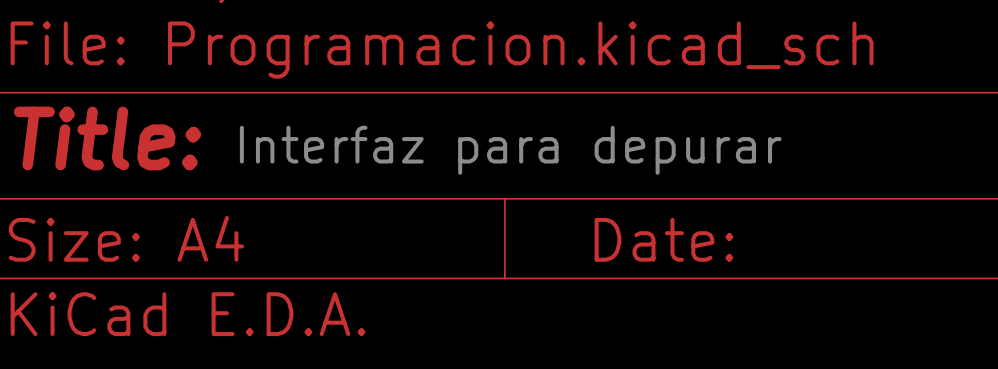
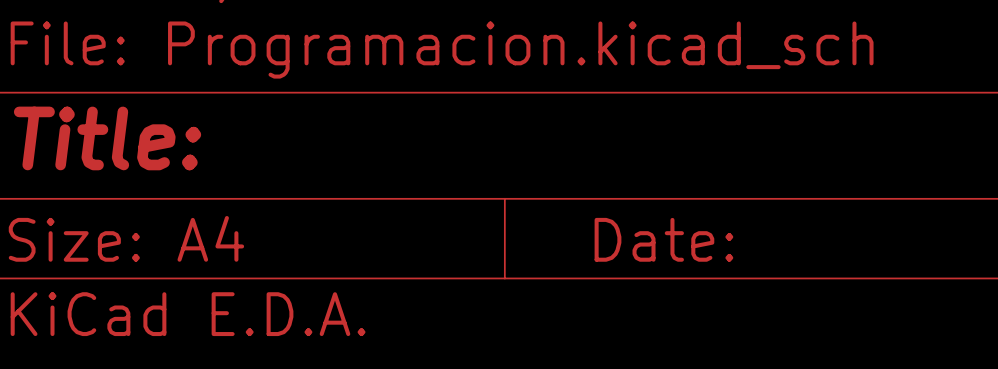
text: Interfaz para depurar (510, 150) -> none

